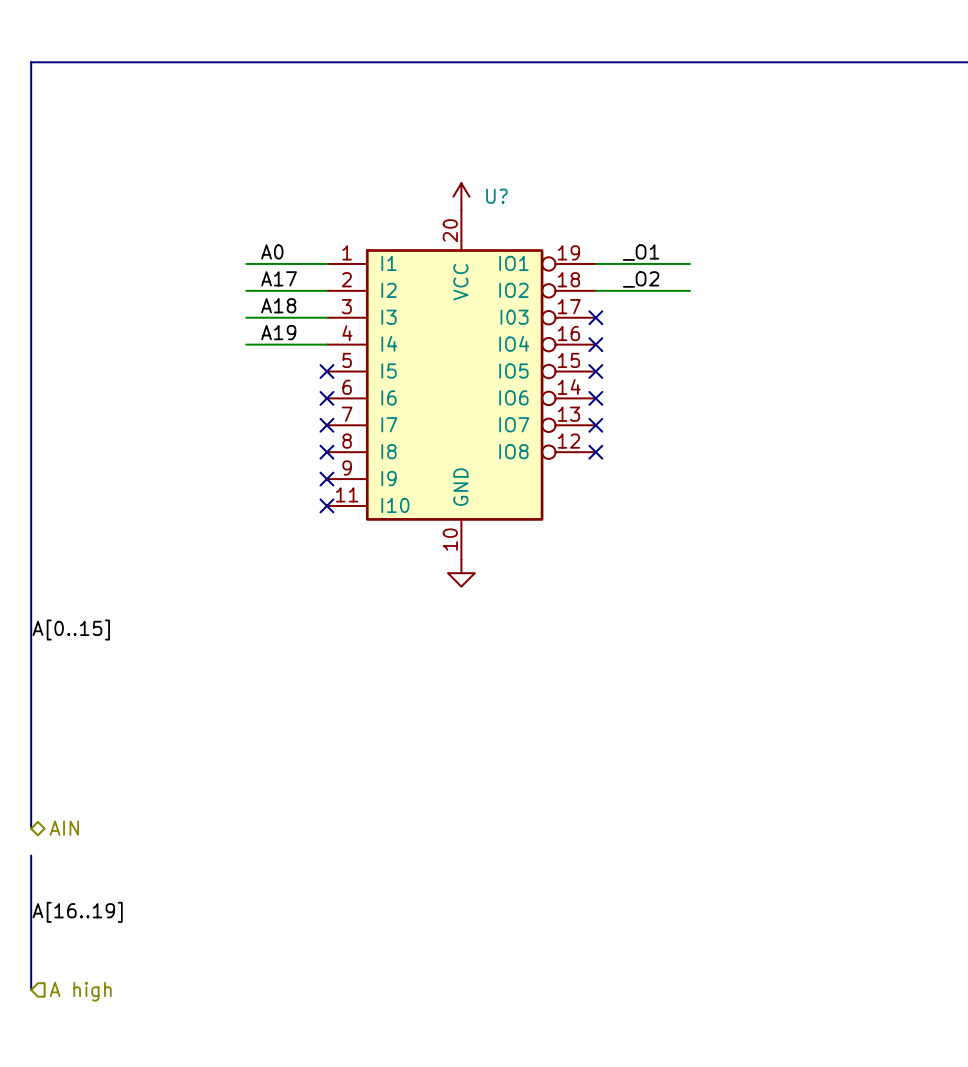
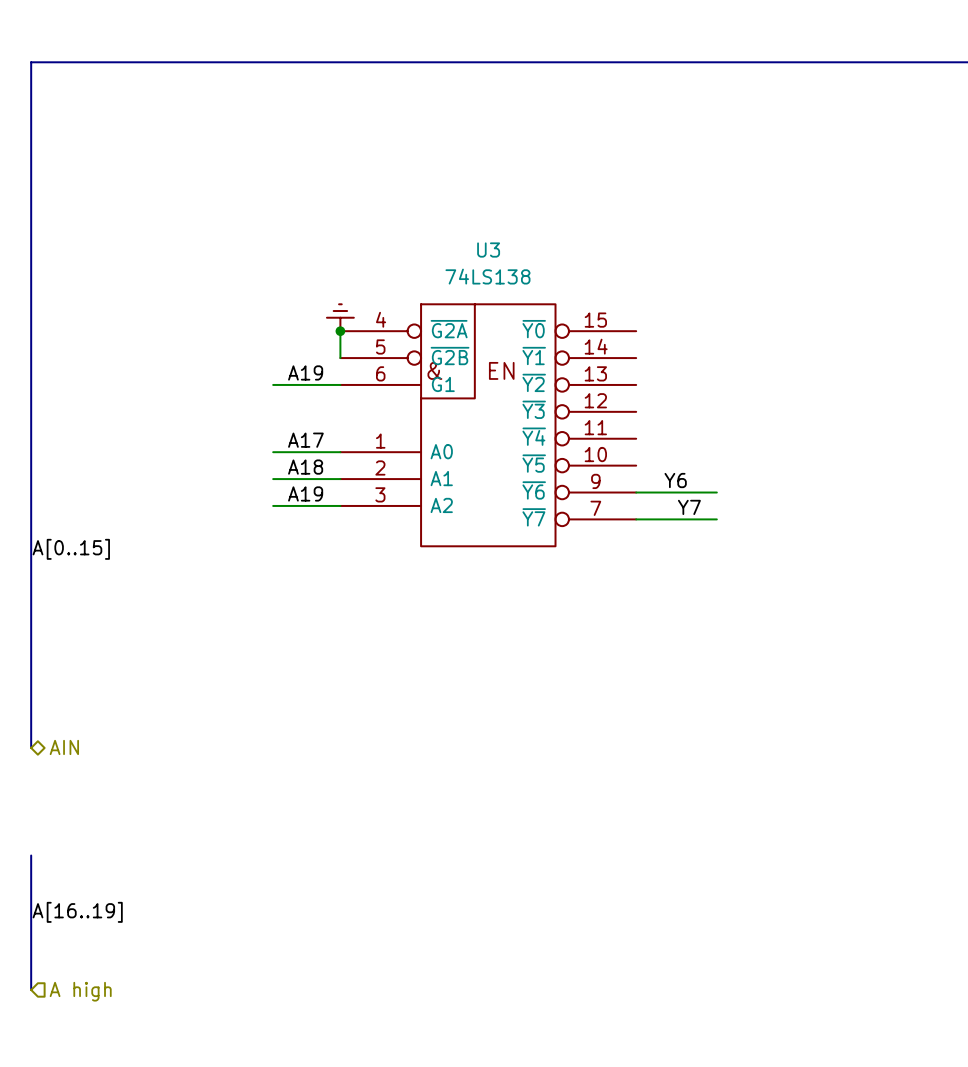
power symbol: (461, 196) -> none
label: A0 (272, 251) -> none
label: _O1 (641, 252) -> none
wire: (246, 263) (326, 263) -> none
wire: (595, 263) (689, 263) -> none
label position: A17 (279, 278) -> A17 (305, 440)
label: _O2 (641, 279) -> none
wire: (246, 290) (326, 290) -> none
wire: (595, 290) (689, 290) -> none
label position: A18 (278, 305) -> A18 (305, 467)
wire: (246, 317) (326, 317) -> none
power symbol: none -> (340, 317)
no-connect mark: (595, 317) -> none
wire: none -> (340, 331) (340, 358)
junction: none -> (340, 331)
label position: A19 (278, 332) -> A19 (305, 372)
wire: (246, 344) (326, 344) -> none
no-connect mark: (595, 344) -> none
no-connect mark: (326, 371) -> none
no-connect mark: (595, 371) -> none
wire: none -> (273, 384) (340, 384)
U?: (461, 384) -> none
no-connect mark: (326, 398) -> none
no-connect mark: (595, 398) -> none
no-connect mark: (326, 425) -> none
U3: none -> 74LS138 (488, 425)
no-connect mark: (595, 425) -> none
wire: none -> (273, 452) (340, 452)
no-connect mark: (326, 452) -> none
no-connect mark: (595, 452) -> none
wire: none -> (273, 479) (340, 479)
no-connect mark: (326, 479) -> none
label: none -> Y6 (675, 480)
wire: none -> (636, 492) (716, 492)
label: none -> A19 (305, 493)
wire: none -> (273, 505) (340, 505)
no-connect mark: (326, 505) -> none
label: none -> Y7 (689, 507)
wire: none -> (636, 519) (716, 519)
power symbol: (461, 573) -> none
label position: A[0..15] (71, 630) -> A[0..15] (71, 549)
bus: (31, 747) (31, 828) -> none
hierarchical label position: AIN (64, 828) -> AIN (64, 747)

